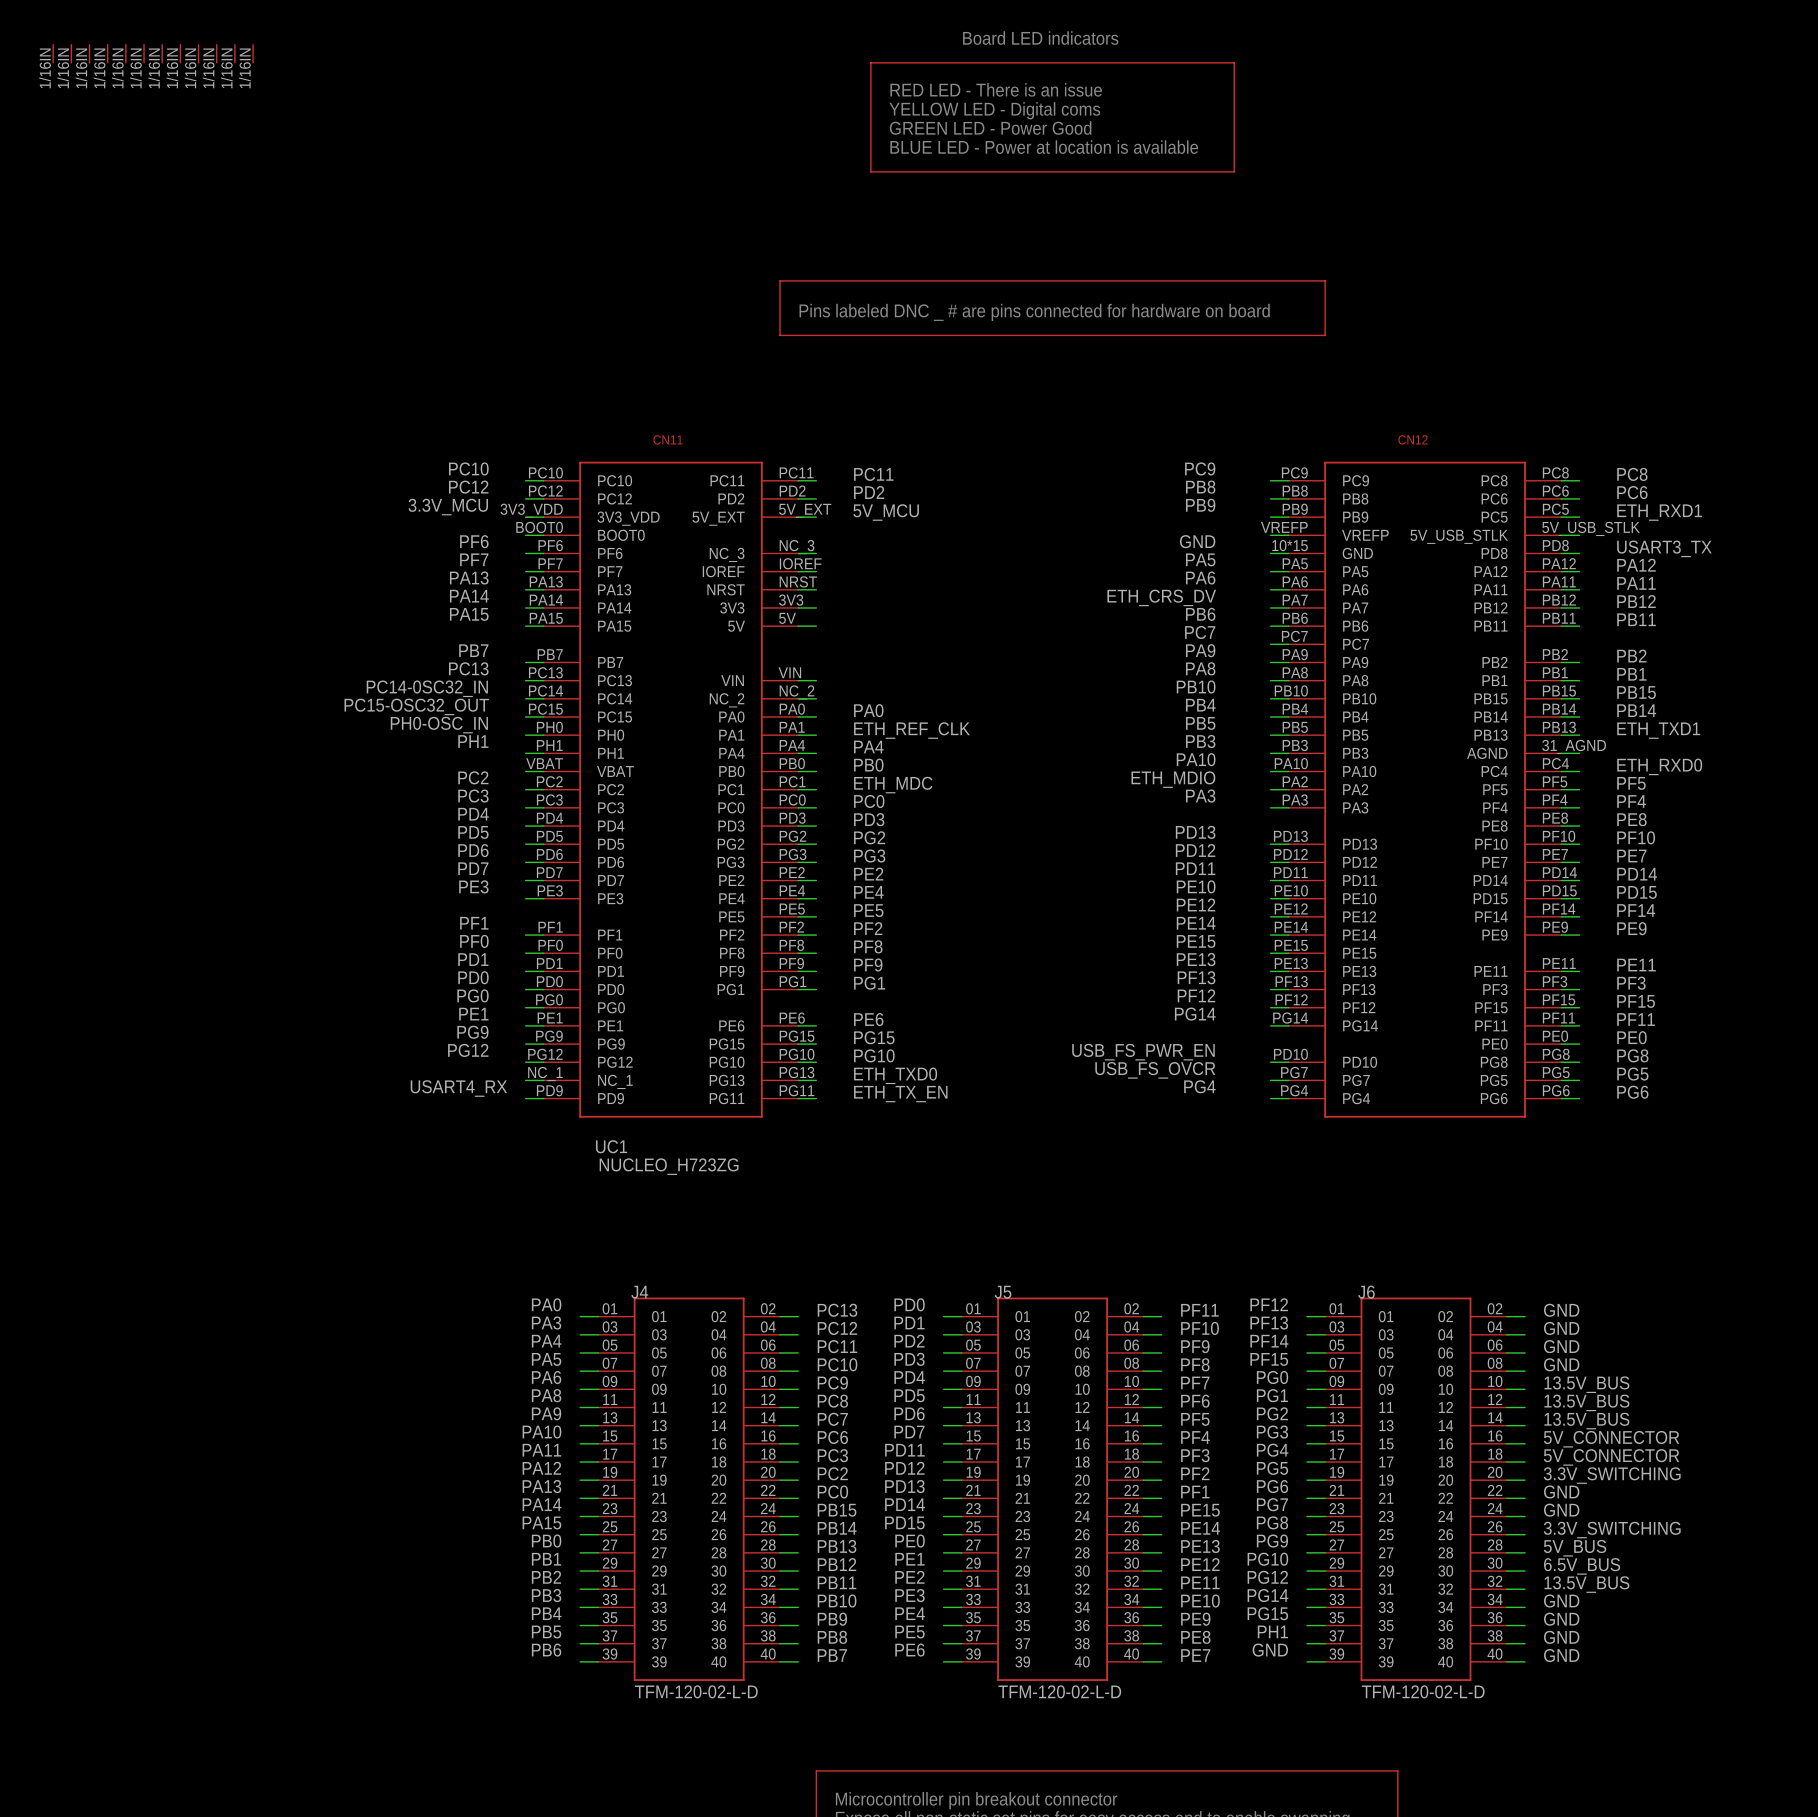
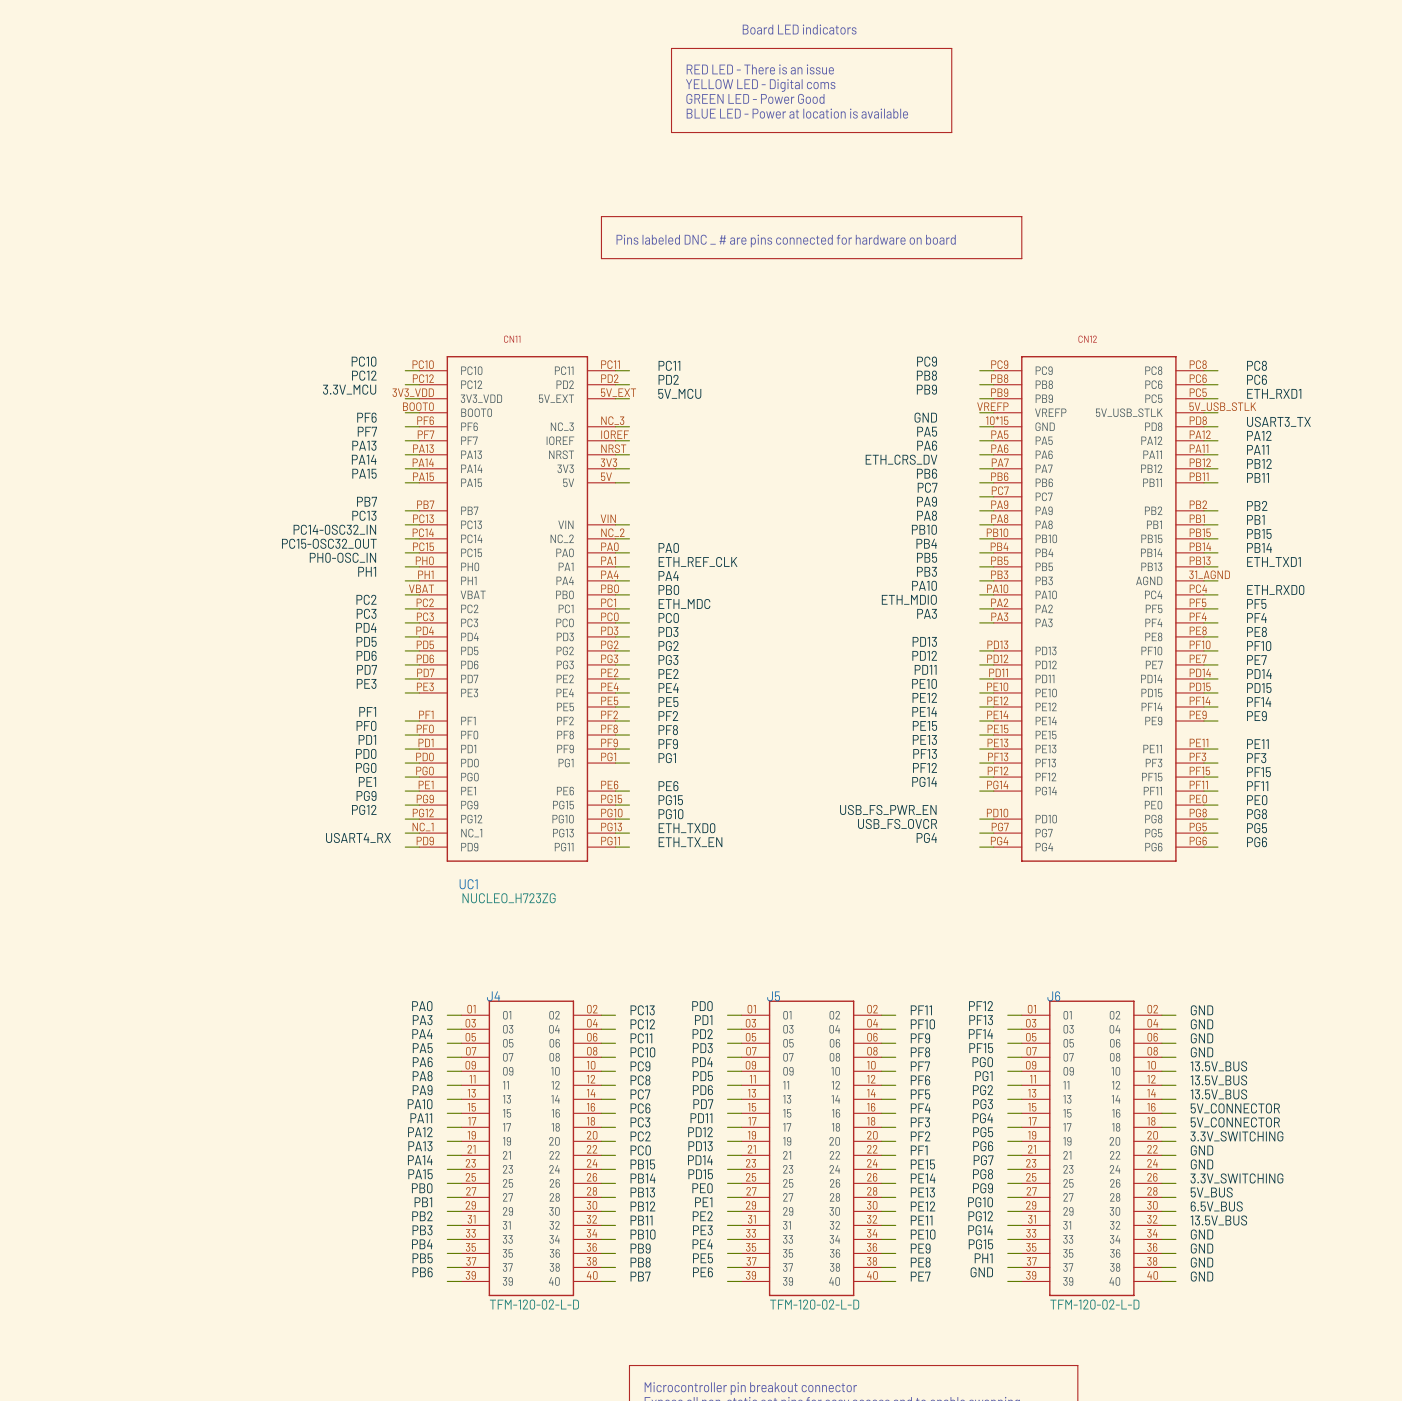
part: (53, 53) -> none
part: (71, 53) -> none
part: (89, 53) -> none
part: (107, 53) -> none
part: (125, 53) -> none
part: (144, 53) -> none
part: (162, 53) -> none
part: (180, 53) -> none
part: (198, 53) -> none
part: (216, 53) -> none
part: (234, 53) -> none
part: (253, 53) -> none

